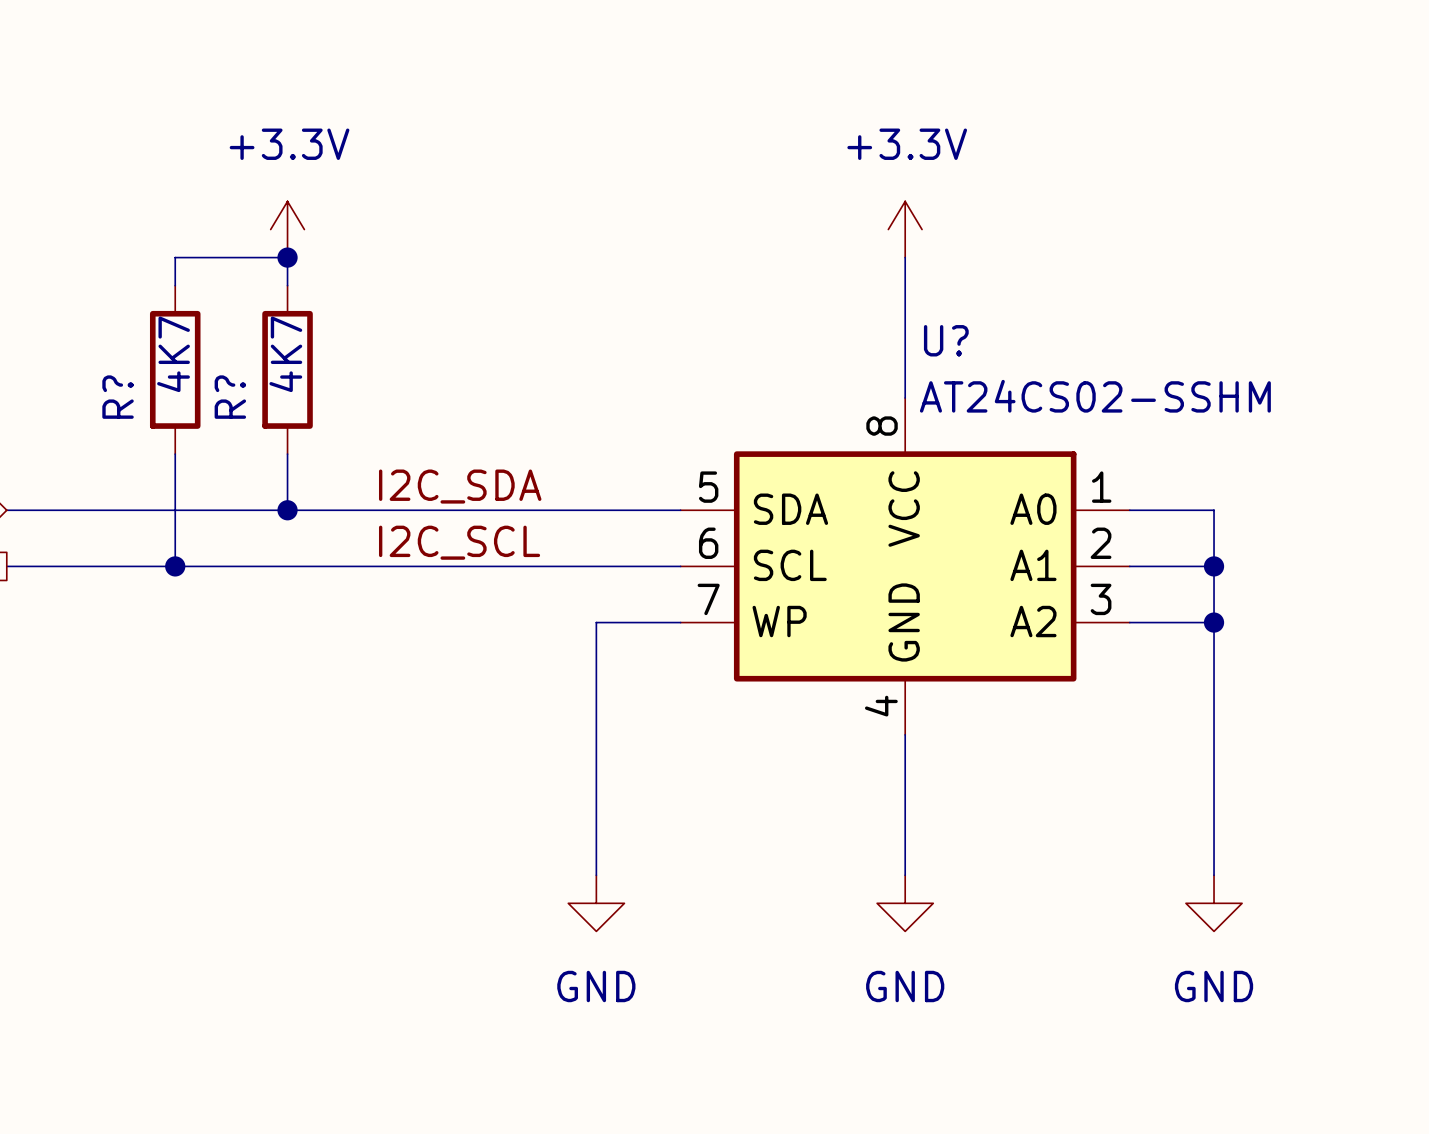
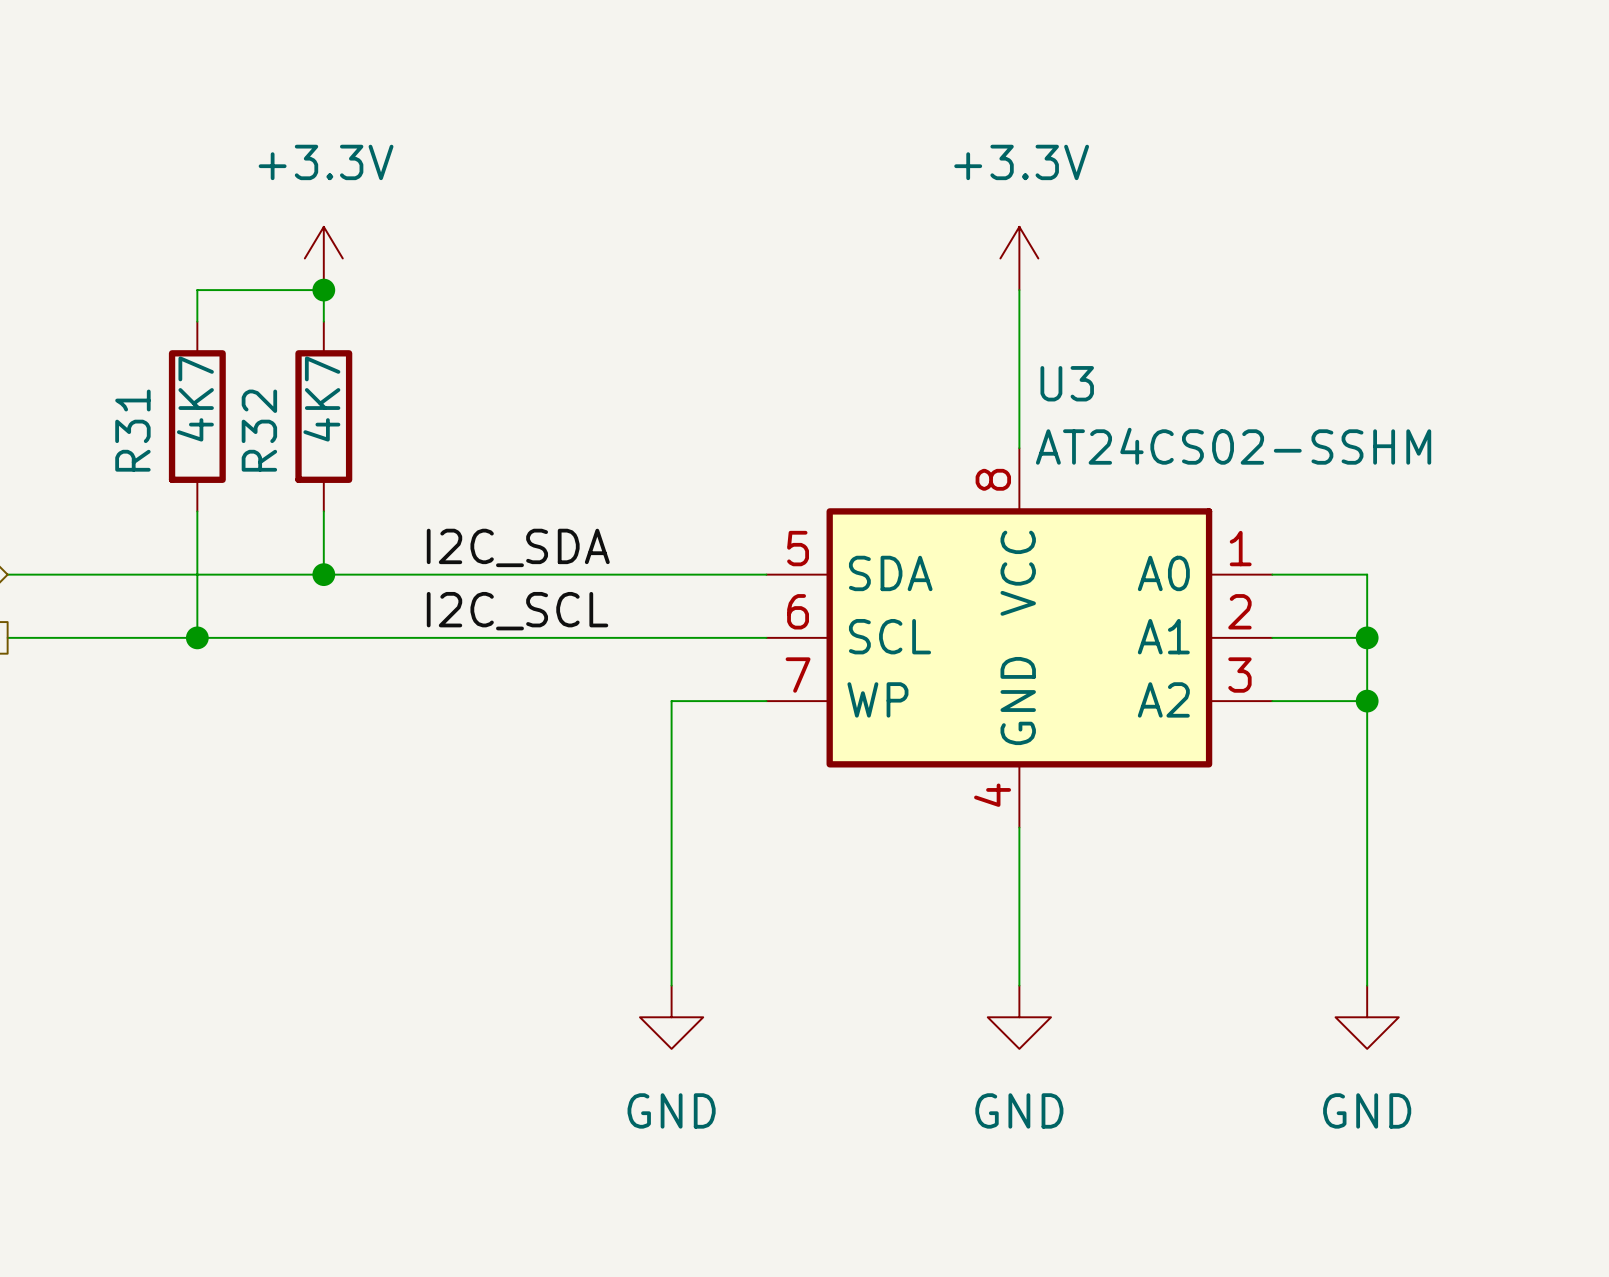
U? name: U? (946, 340) -> U3 (1067, 383)
R? name: R? (118, 397) -> R31 (132, 430)
R? name: R? (230, 397) -> R32 (259, 430)

